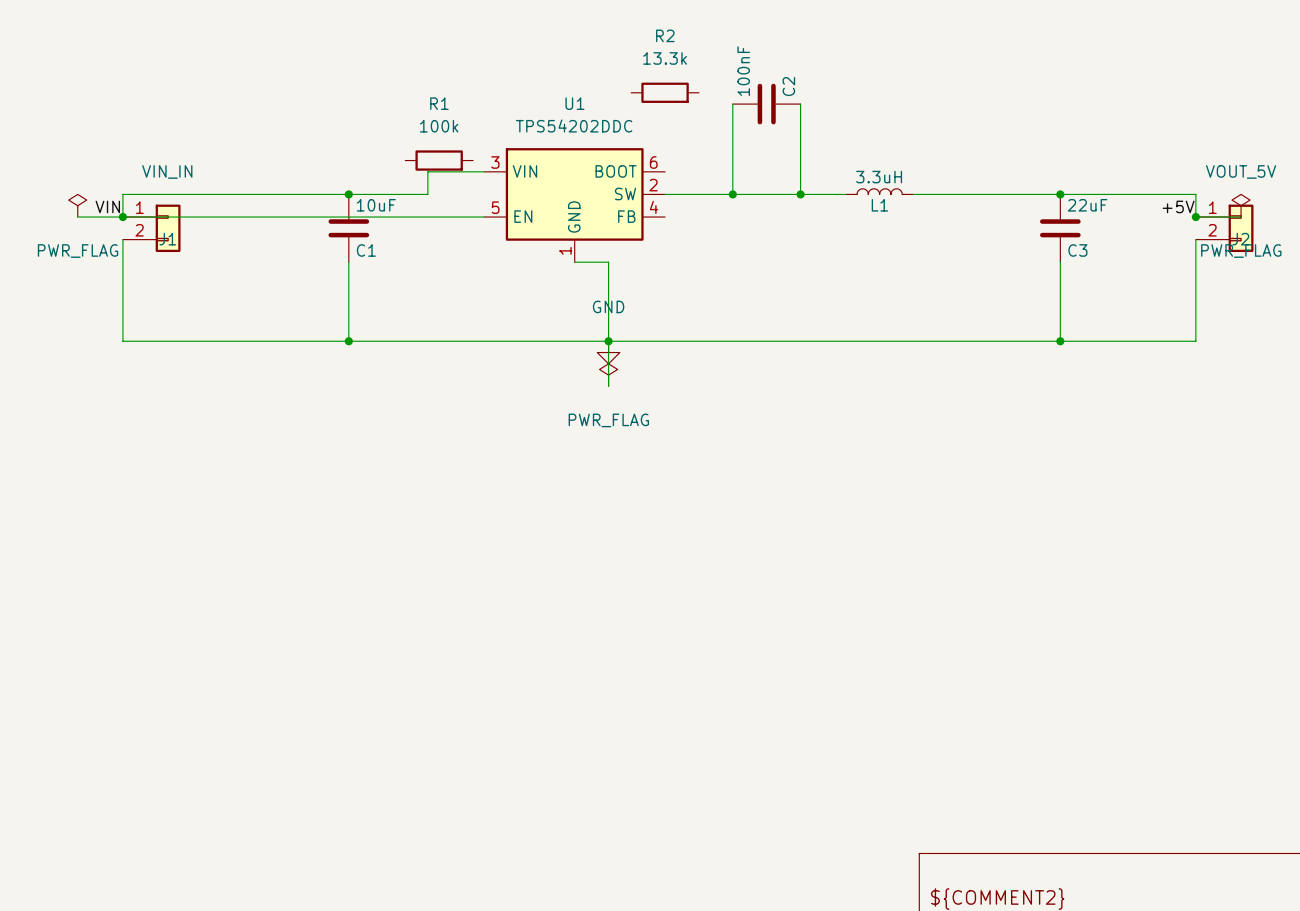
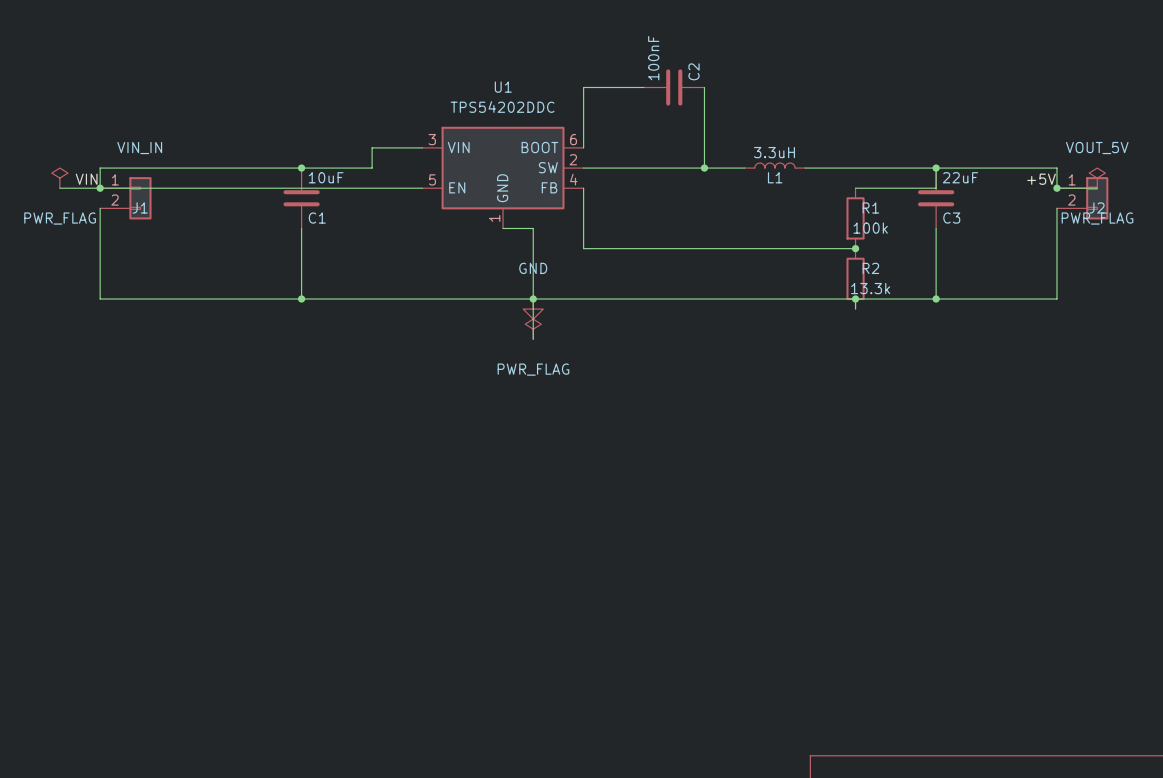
R2 name position: R2 (665, 35) -> R2 (870, 268)
R2 value position: 13.3k (665, 58) -> 13.3k (870, 288)
R2 rotation: 0° (665, 92) -> 90° clockwise (855, 278)
R2 position: (665, 92) -> (855, 278)
R1 name position: R1 (439, 103) -> R1 (870, 207)
wire: (732, 104) (732, 194) -> (644, 87) (583, 87) (583, 147)
R1 value position: 100k (439, 126) -> 100k (870, 228)
R1 rotation: 0° (439, 160) -> 90° clockwise (855, 218)
R1 position: (439, 160) -> (855, 218)
junction: (732, 194) -> none
wire: none -> (936, 168) (936, 188) (855, 188)
wire: none -> (583, 188) (583, 248) (855, 248)
junction: none -> (855, 248)
wire: none -> (855, 298) (855, 309)
junction: none -> (855, 298)

